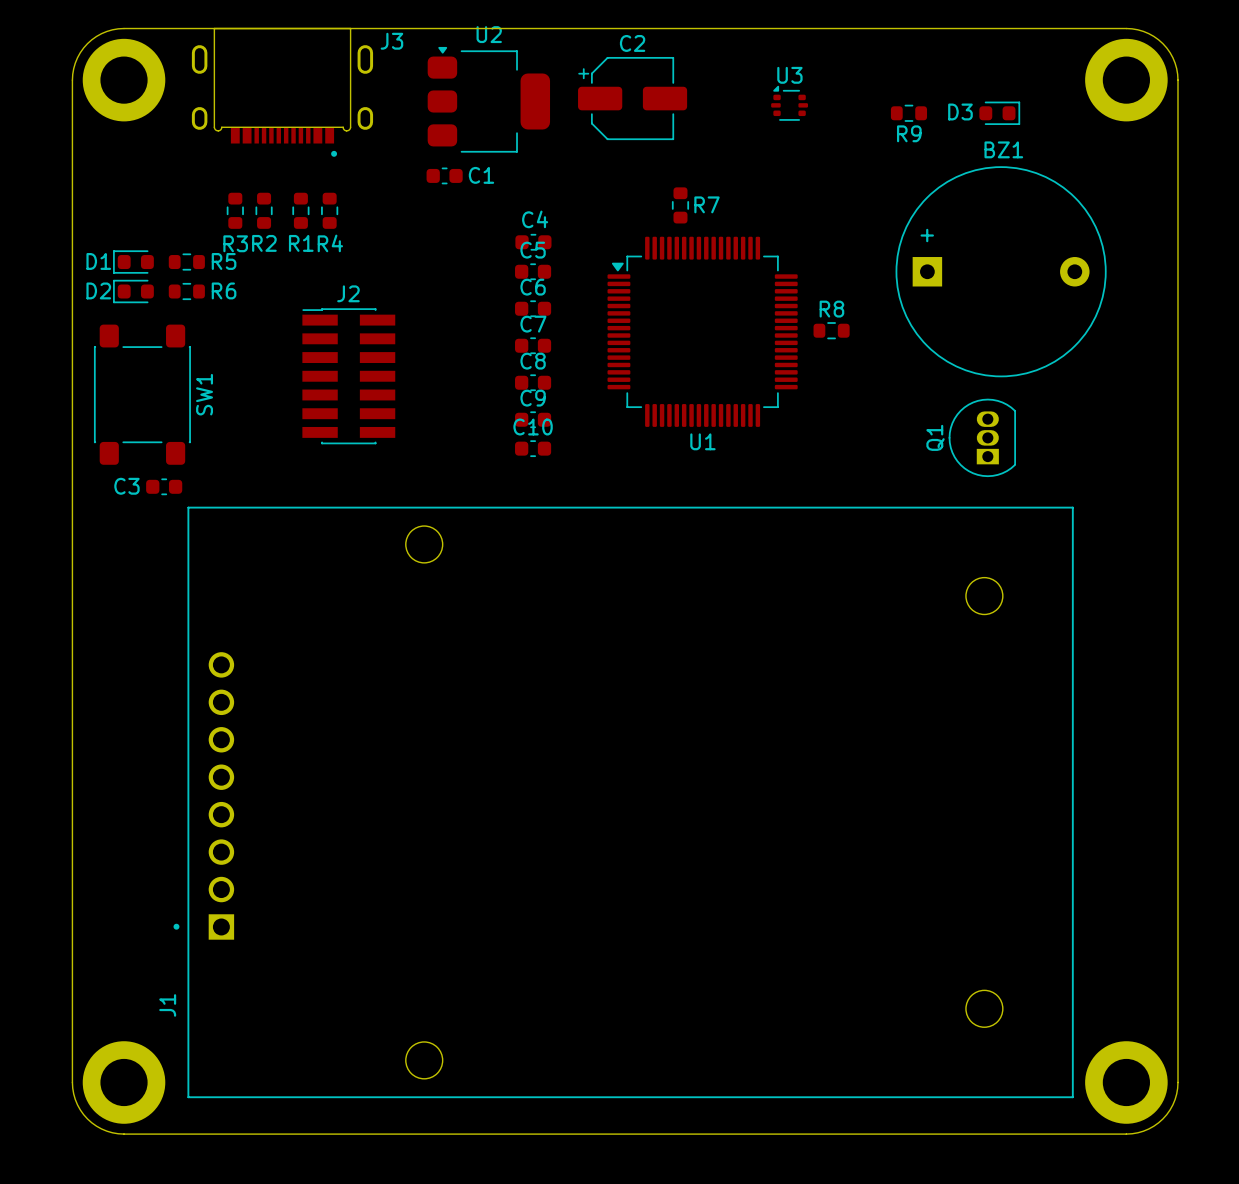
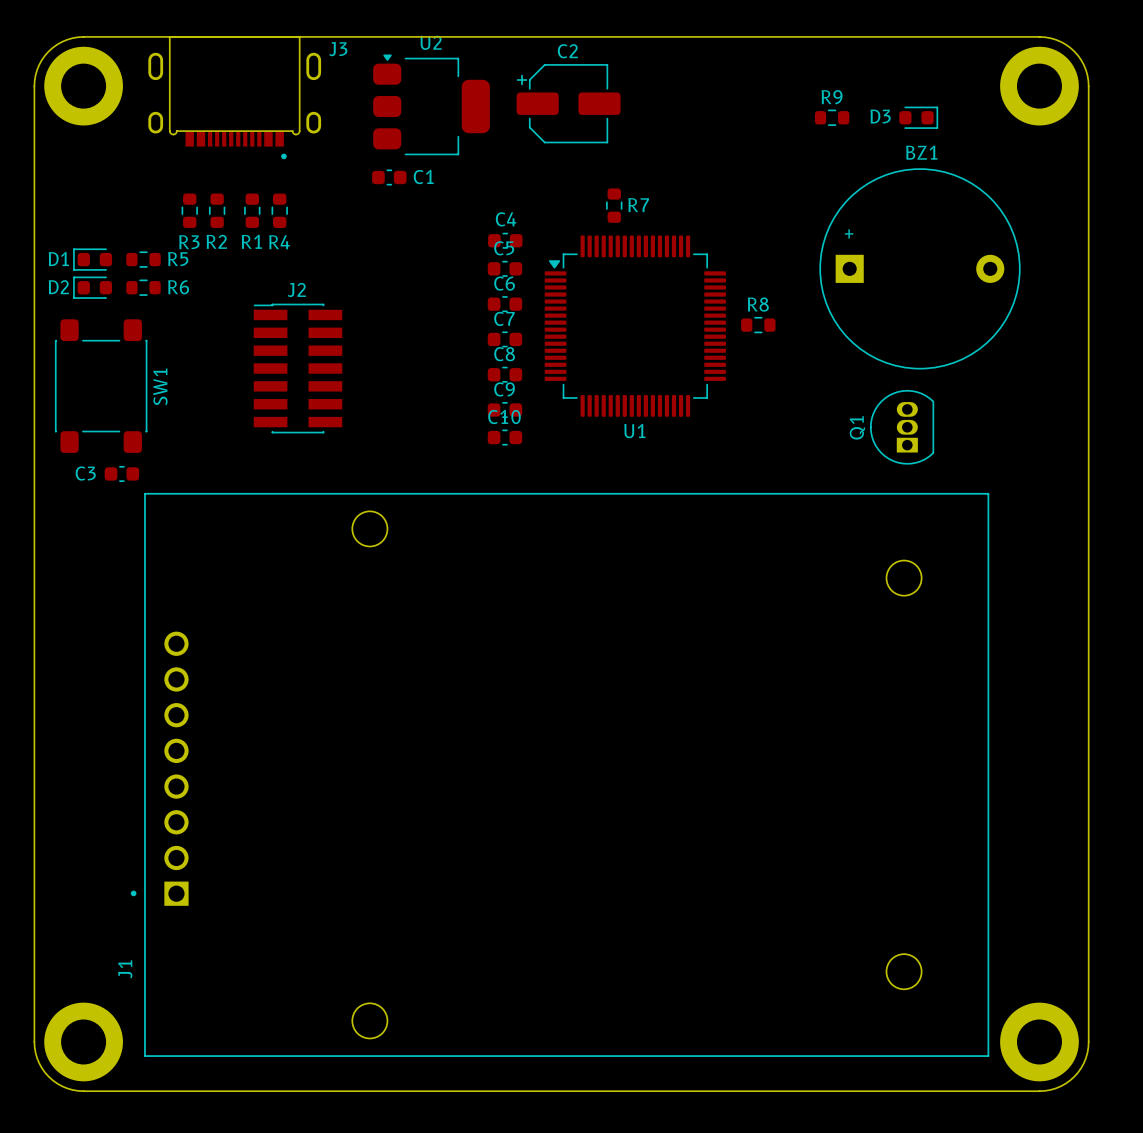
U3: (789, 103) -> none
R9 name position: R9 (909, 133) -> R9 (832, 97)
C4 position: (533, 242) -> (505, 240)
C5 position: (533, 271) -> (504, 268)
C6 position: (533, 308) -> (504, 304)
C7 position: (533, 345) -> (504, 339)
C8 position: (533, 382) -> (504, 374)
C9 position: (533, 419) -> (504, 409)
C10 position: (533, 448) -> (504, 437)

